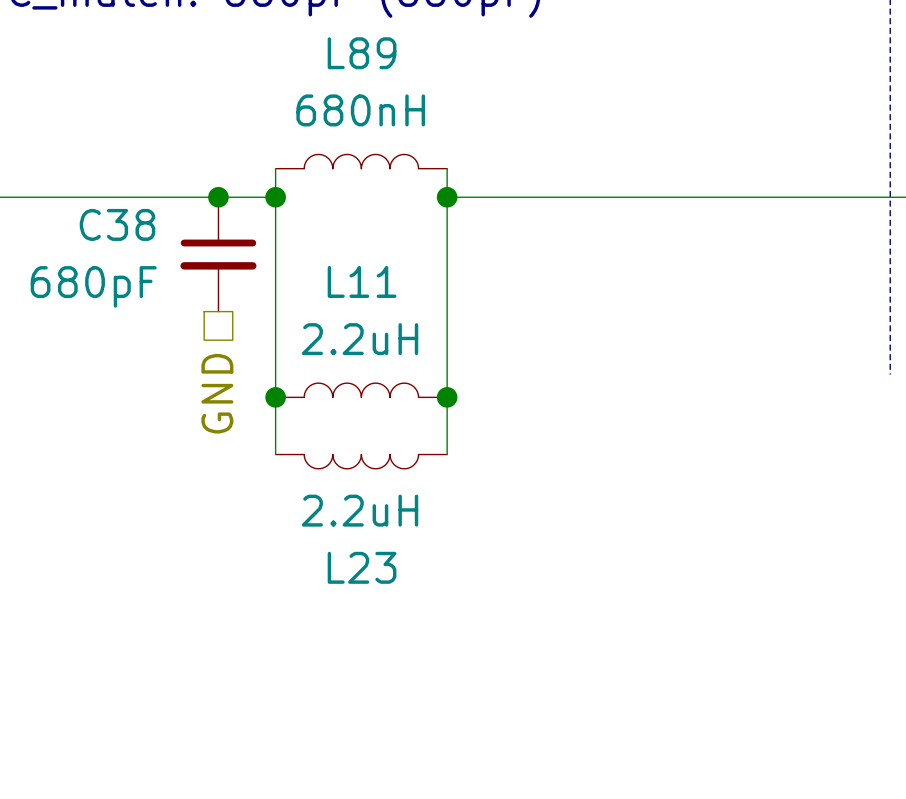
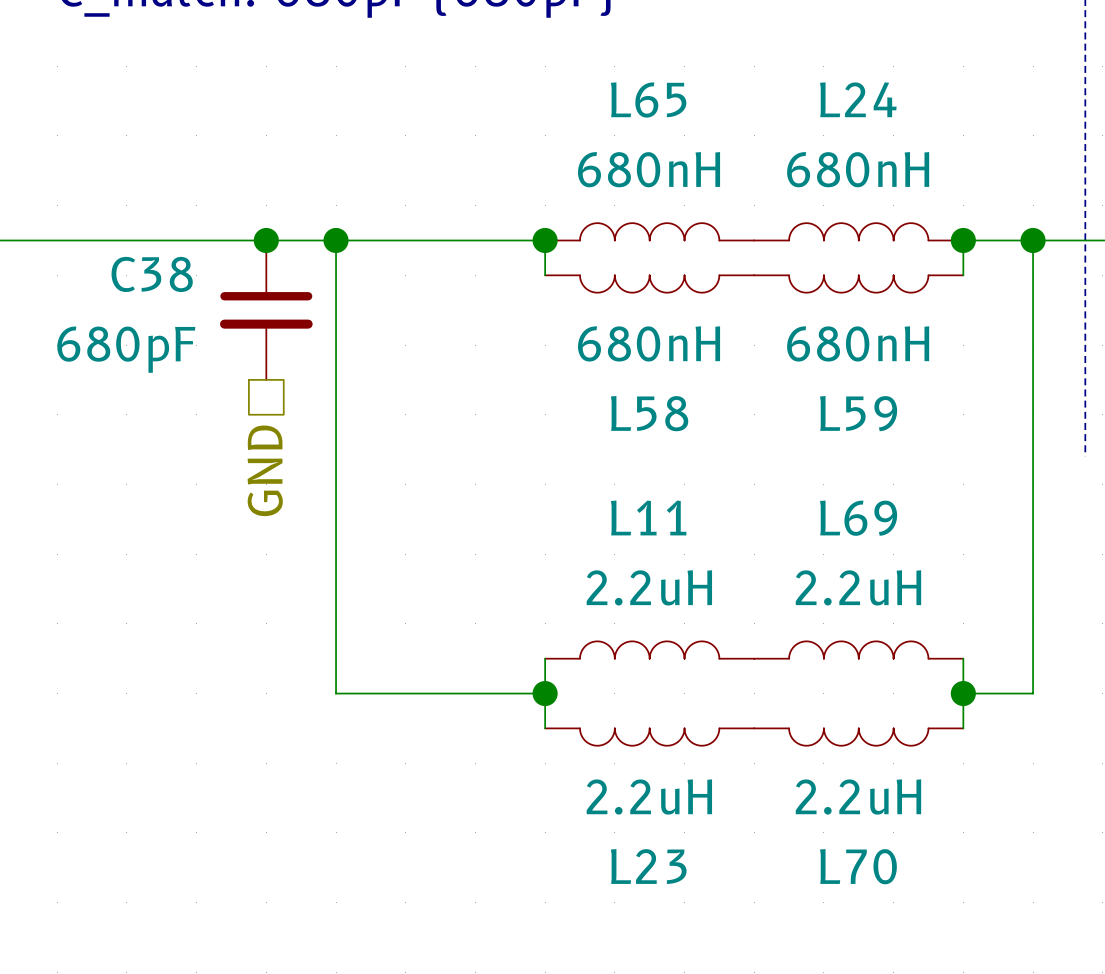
L89: 680nH (361, 161) -> none
wire: (275, 168) (275, 197) -> (545, 240) (336, 240)
wire: (447, 168) (447, 197) (790, 197) -> (963, 275) (963, 240)
L65: none -> 680nH (649, 231)
L24: none -> 680nH (858, 231)
junction: none -> (963, 240)
wire: none -> (1033, 240) (1033, 693) (963, 693)
junction: none -> (1033, 240)
wire: (447, 225) (447, 454) -> none
L58: none -> 680nH (649, 284)
L59: none -> 680nH (858, 284)
L11 position: (361, 390) -> (649, 650)
junction: (275, 397) -> none
junction: (447, 397) -> none
wire: none -> (336, 554) (336, 693) (545, 693)
L23 position: (361, 461) -> (649, 737)
L69: none -> 2.2uH (858, 650)
wire: none -> (545, 658) (545, 728)
wire: none -> (963, 658) (963, 728)
junction: none -> (545, 693)
junction: none -> (963, 693)
L70: none -> 2.2uH (858, 737)

